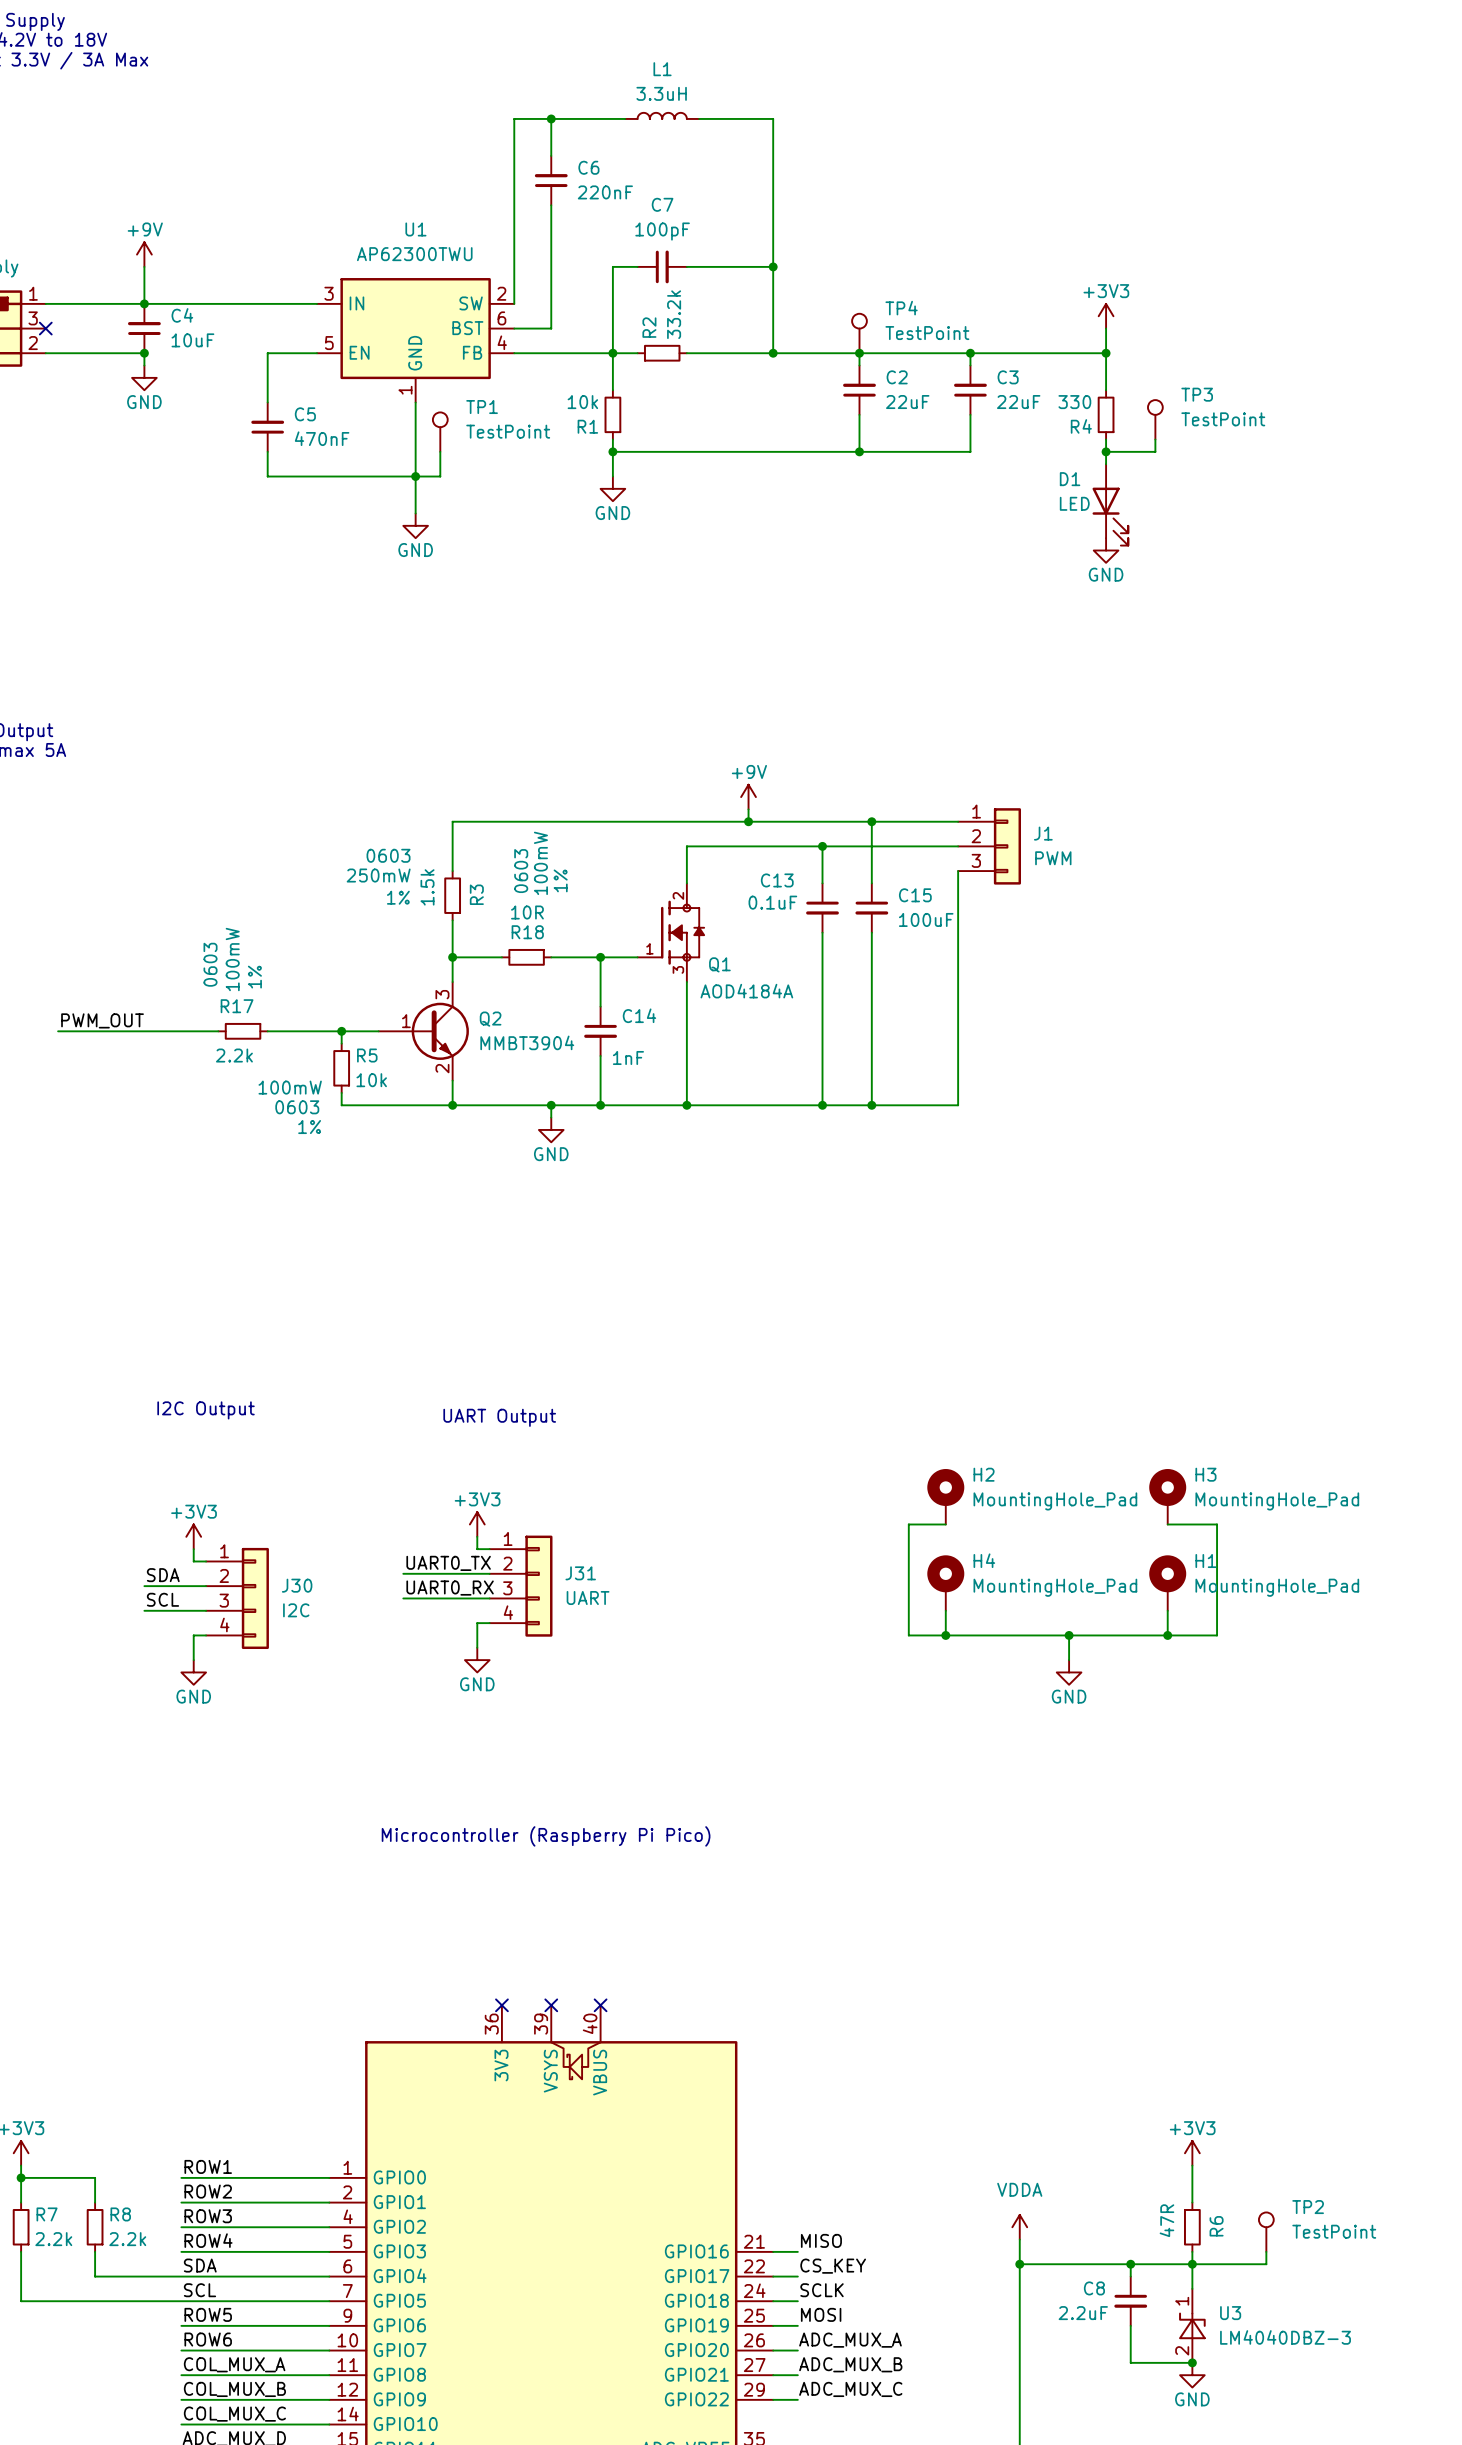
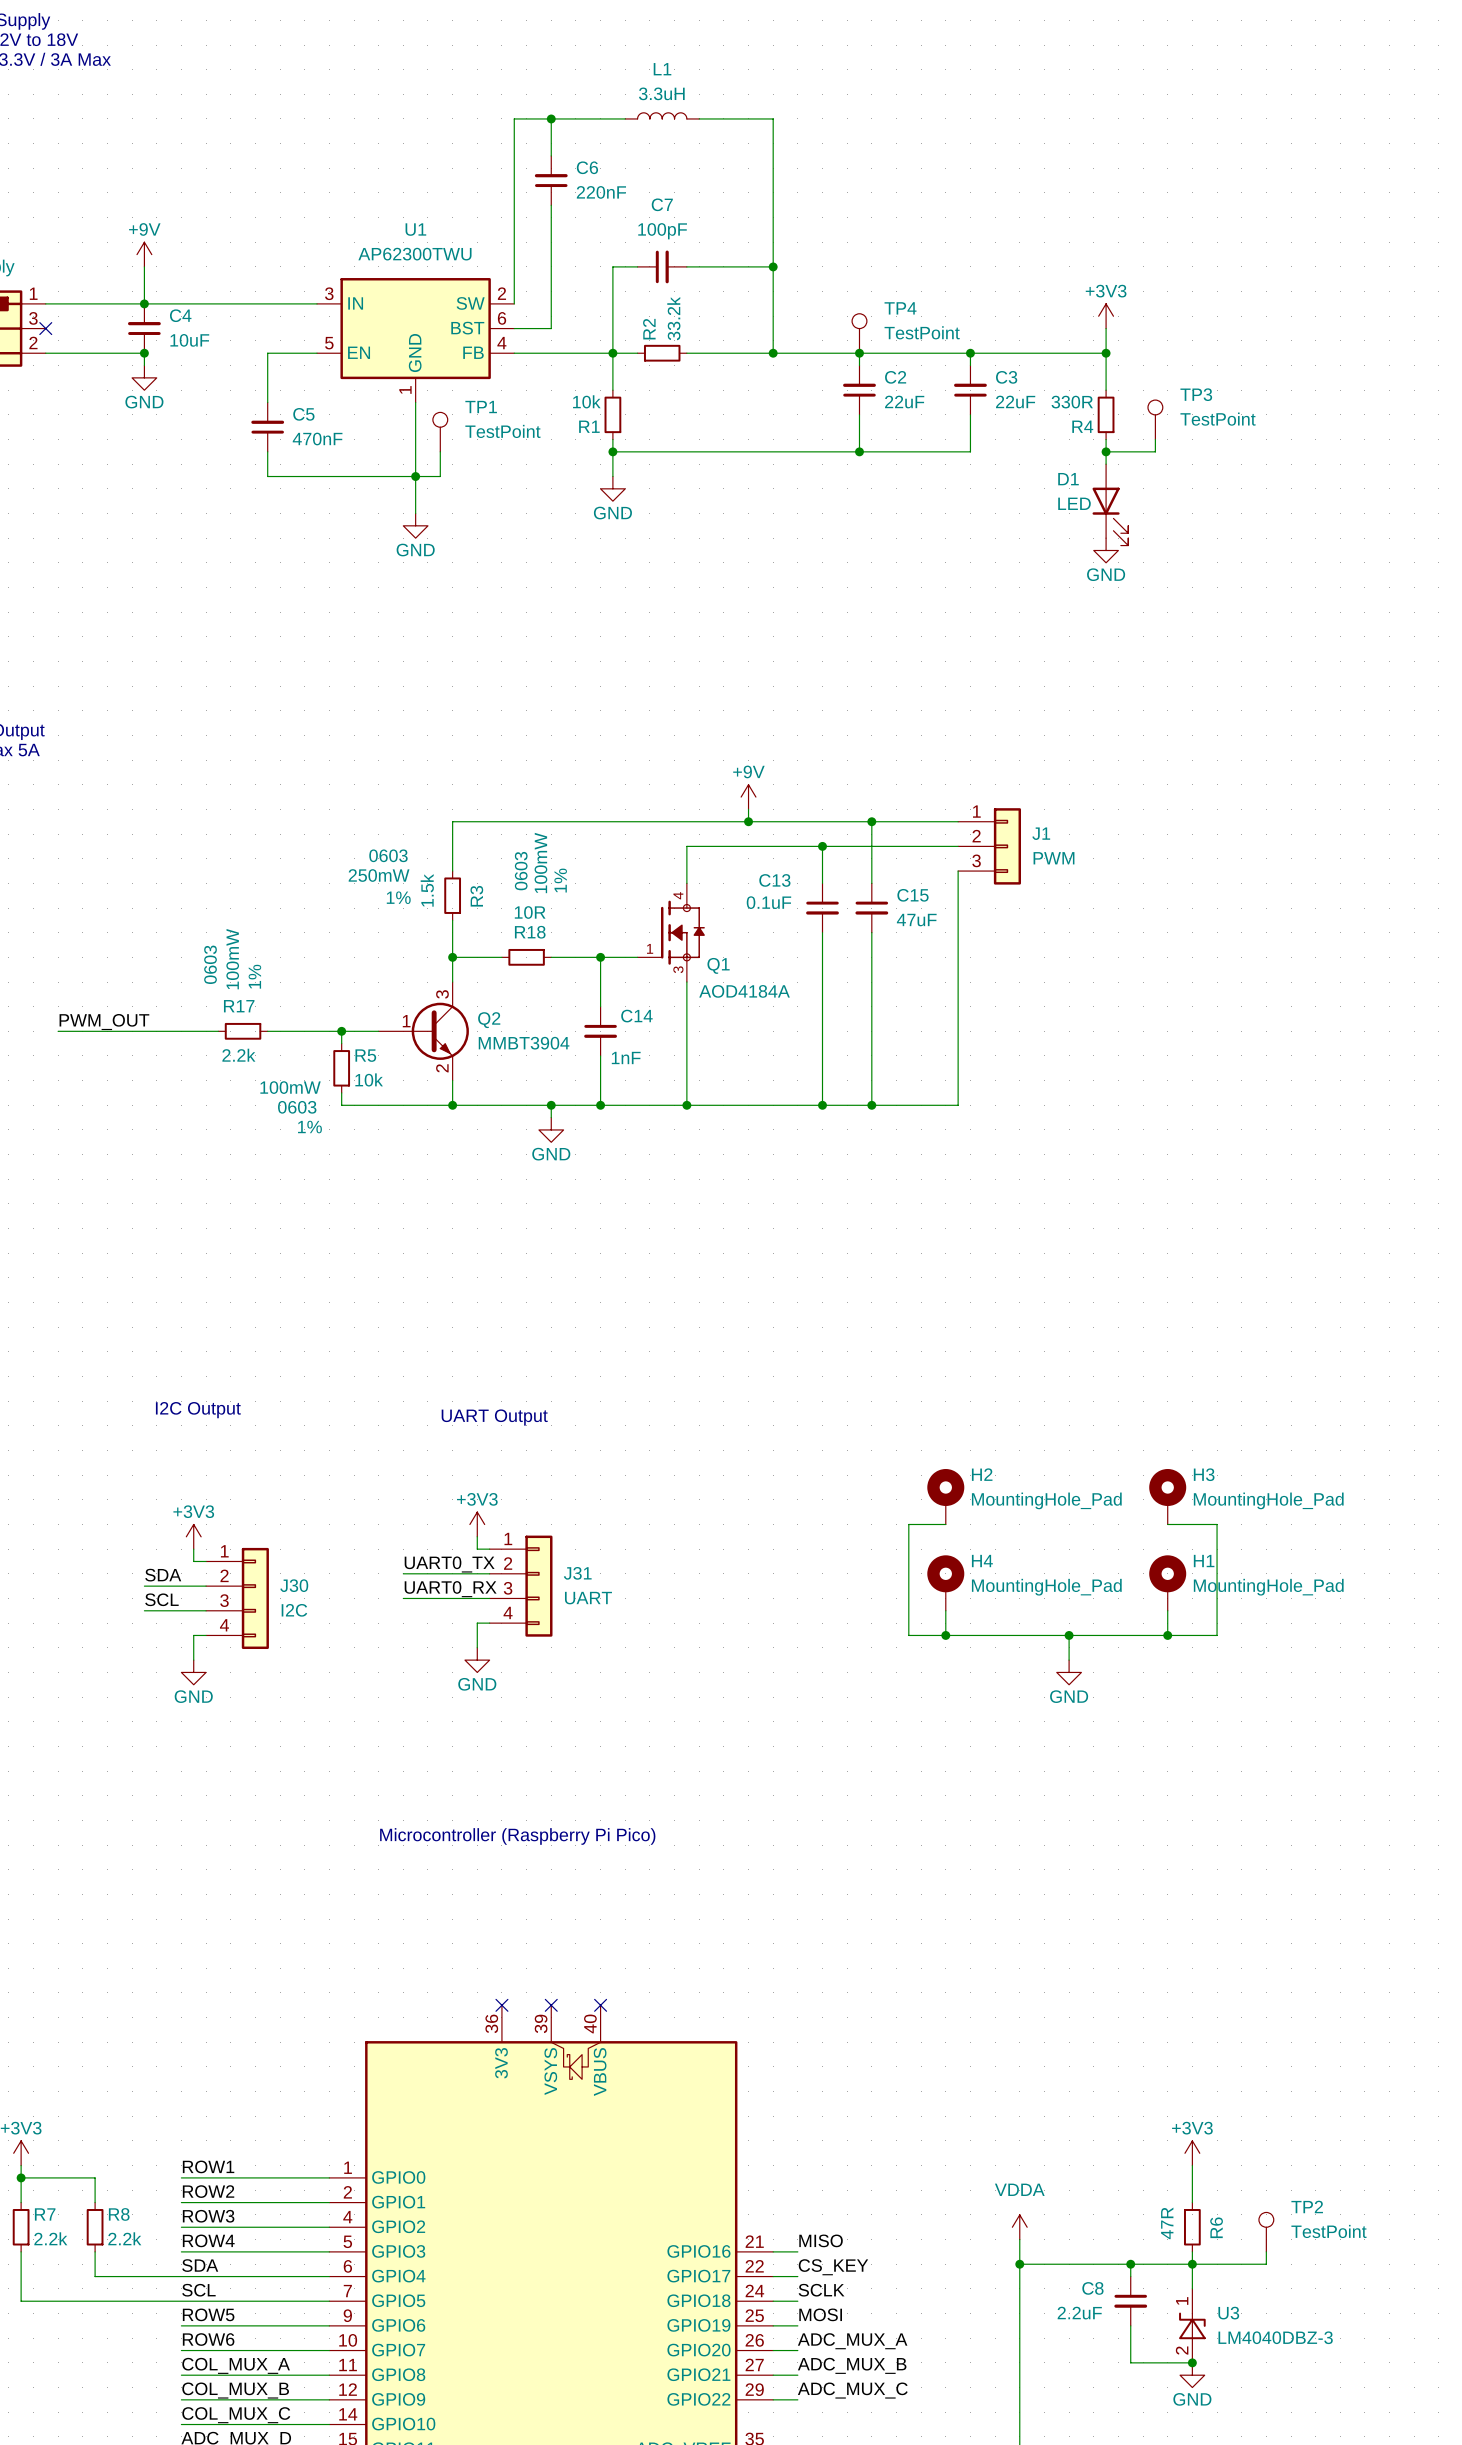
R4 value: 330 (1074, 402) -> 330R (1072, 402)
Q1 pin number: 2 (678, 895) -> 4 (678, 895)
C15 value: 100uF (926, 919) -> 47uF (916, 920)

